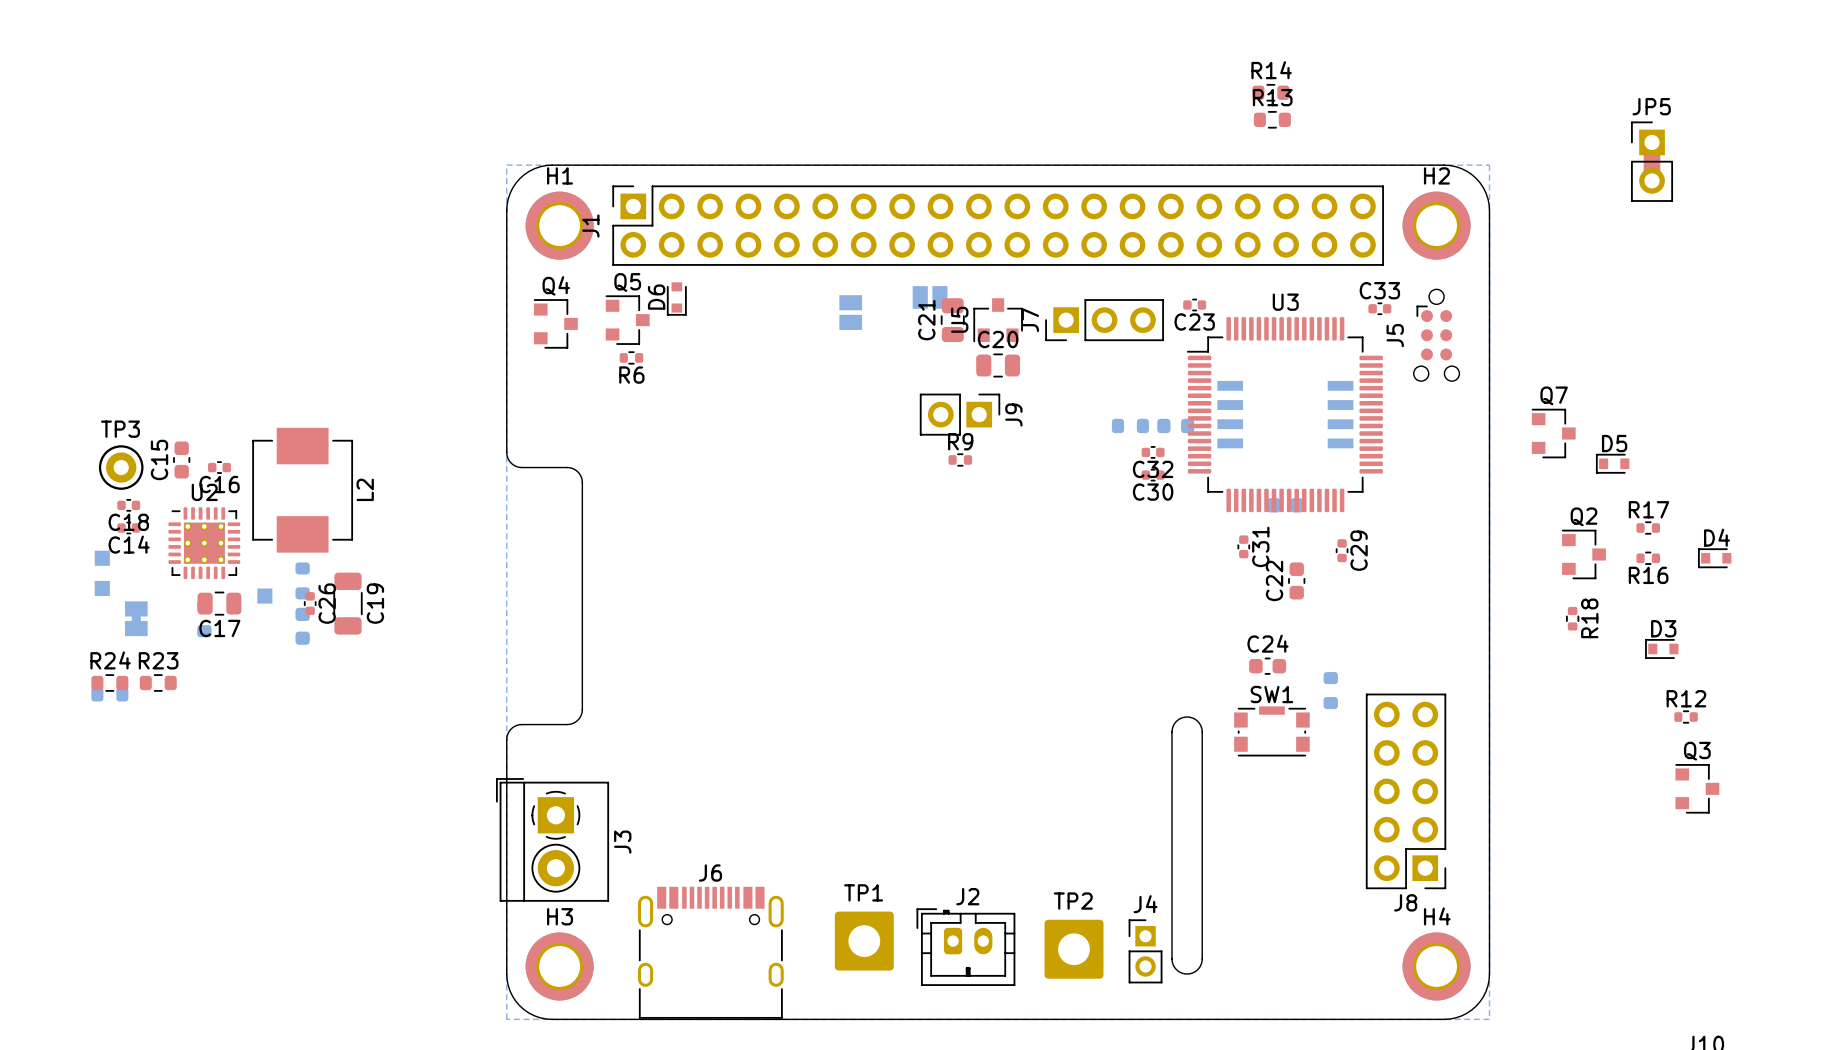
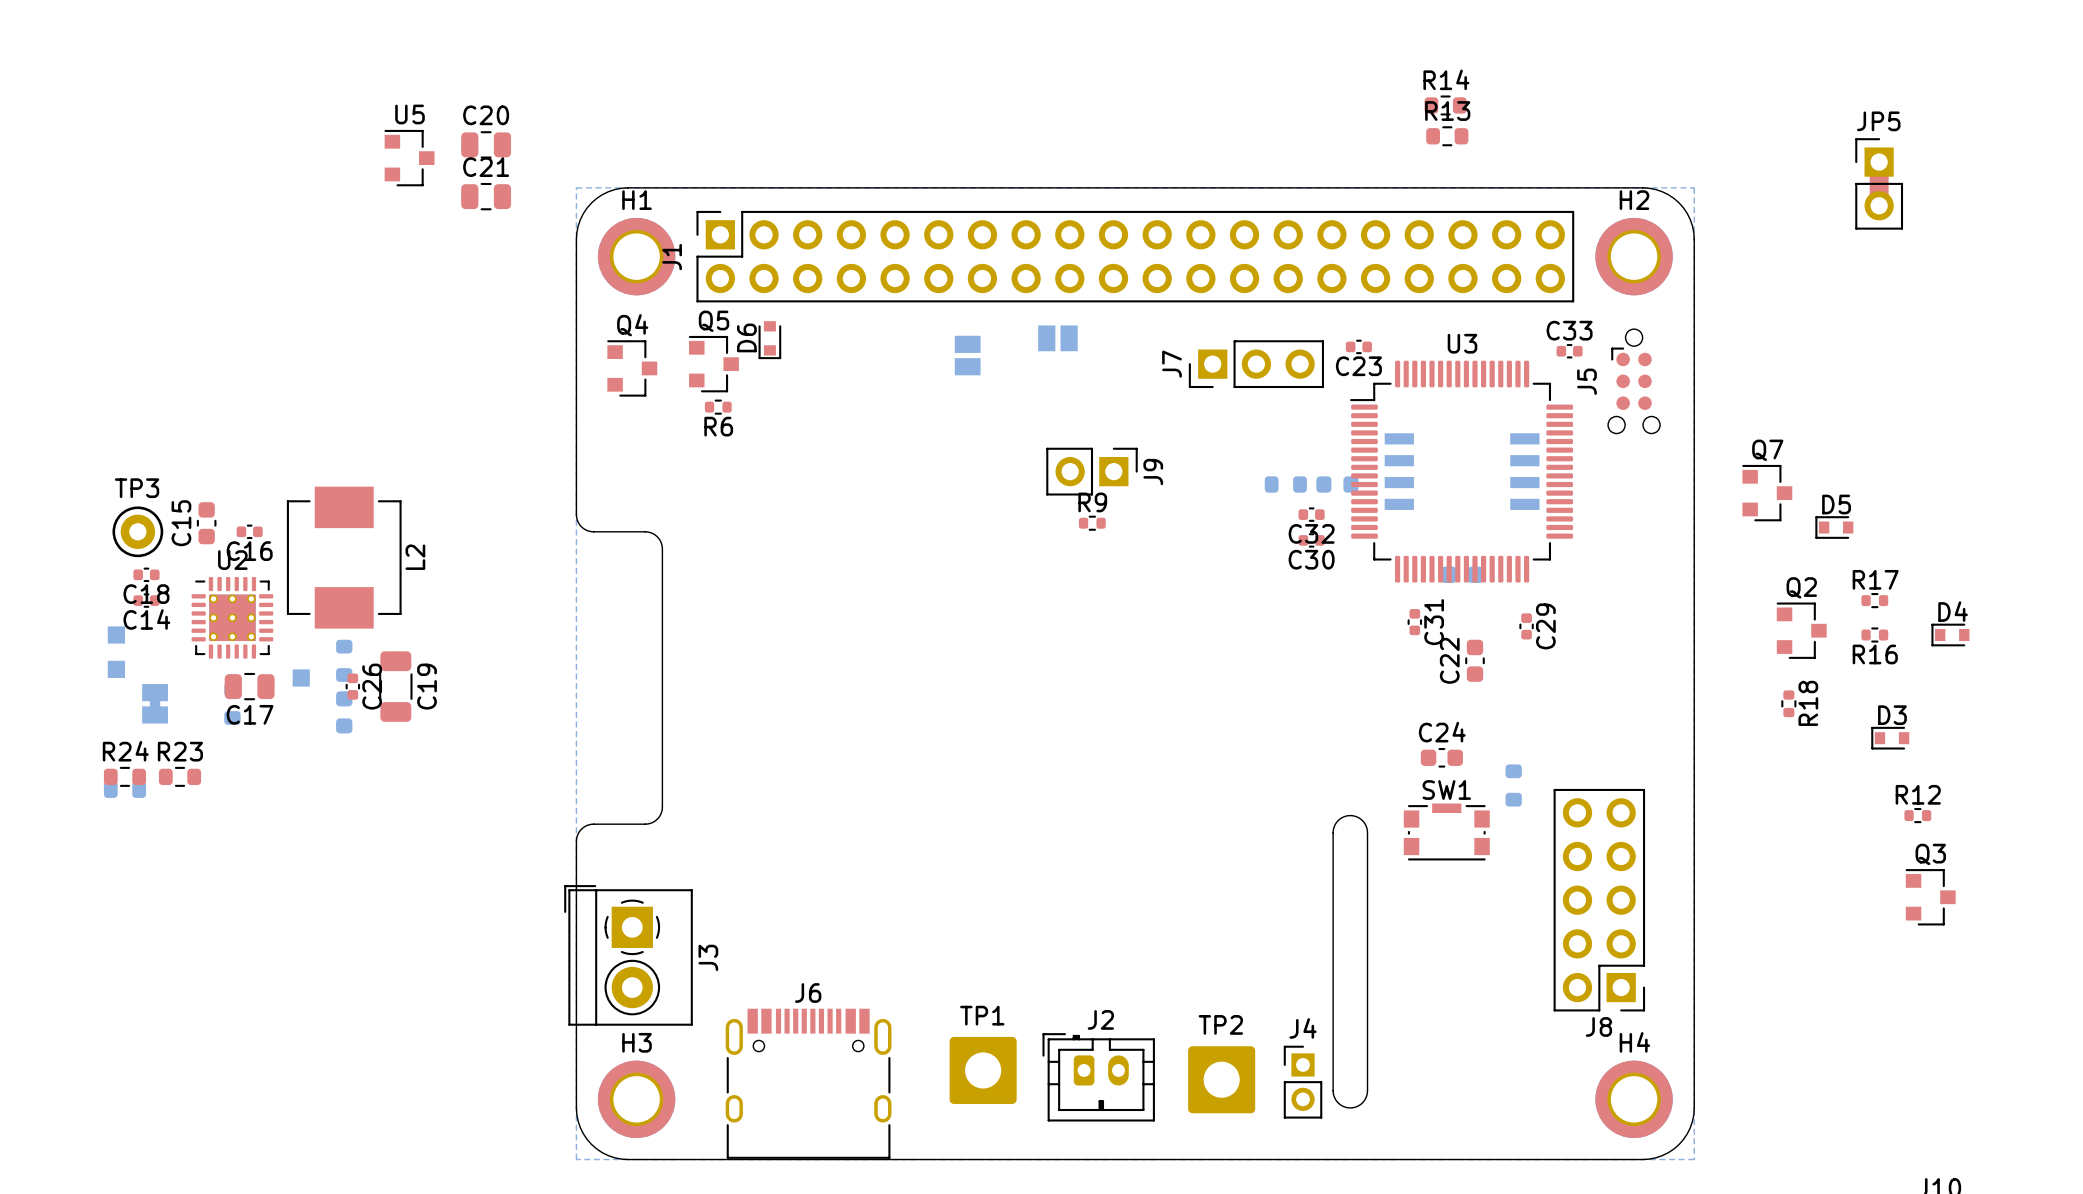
C21 rotation: 0° (952, 320) -> 90° clockwise (486, 196)
C21 position: (952, 320) -> (486, 196)
U5 rotation: 0° (998, 320) -> 90° clockwise (409, 158)
U5 position: (998, 320) -> (409, 158)
C20 position: (998, 365) -> (486, 144)

